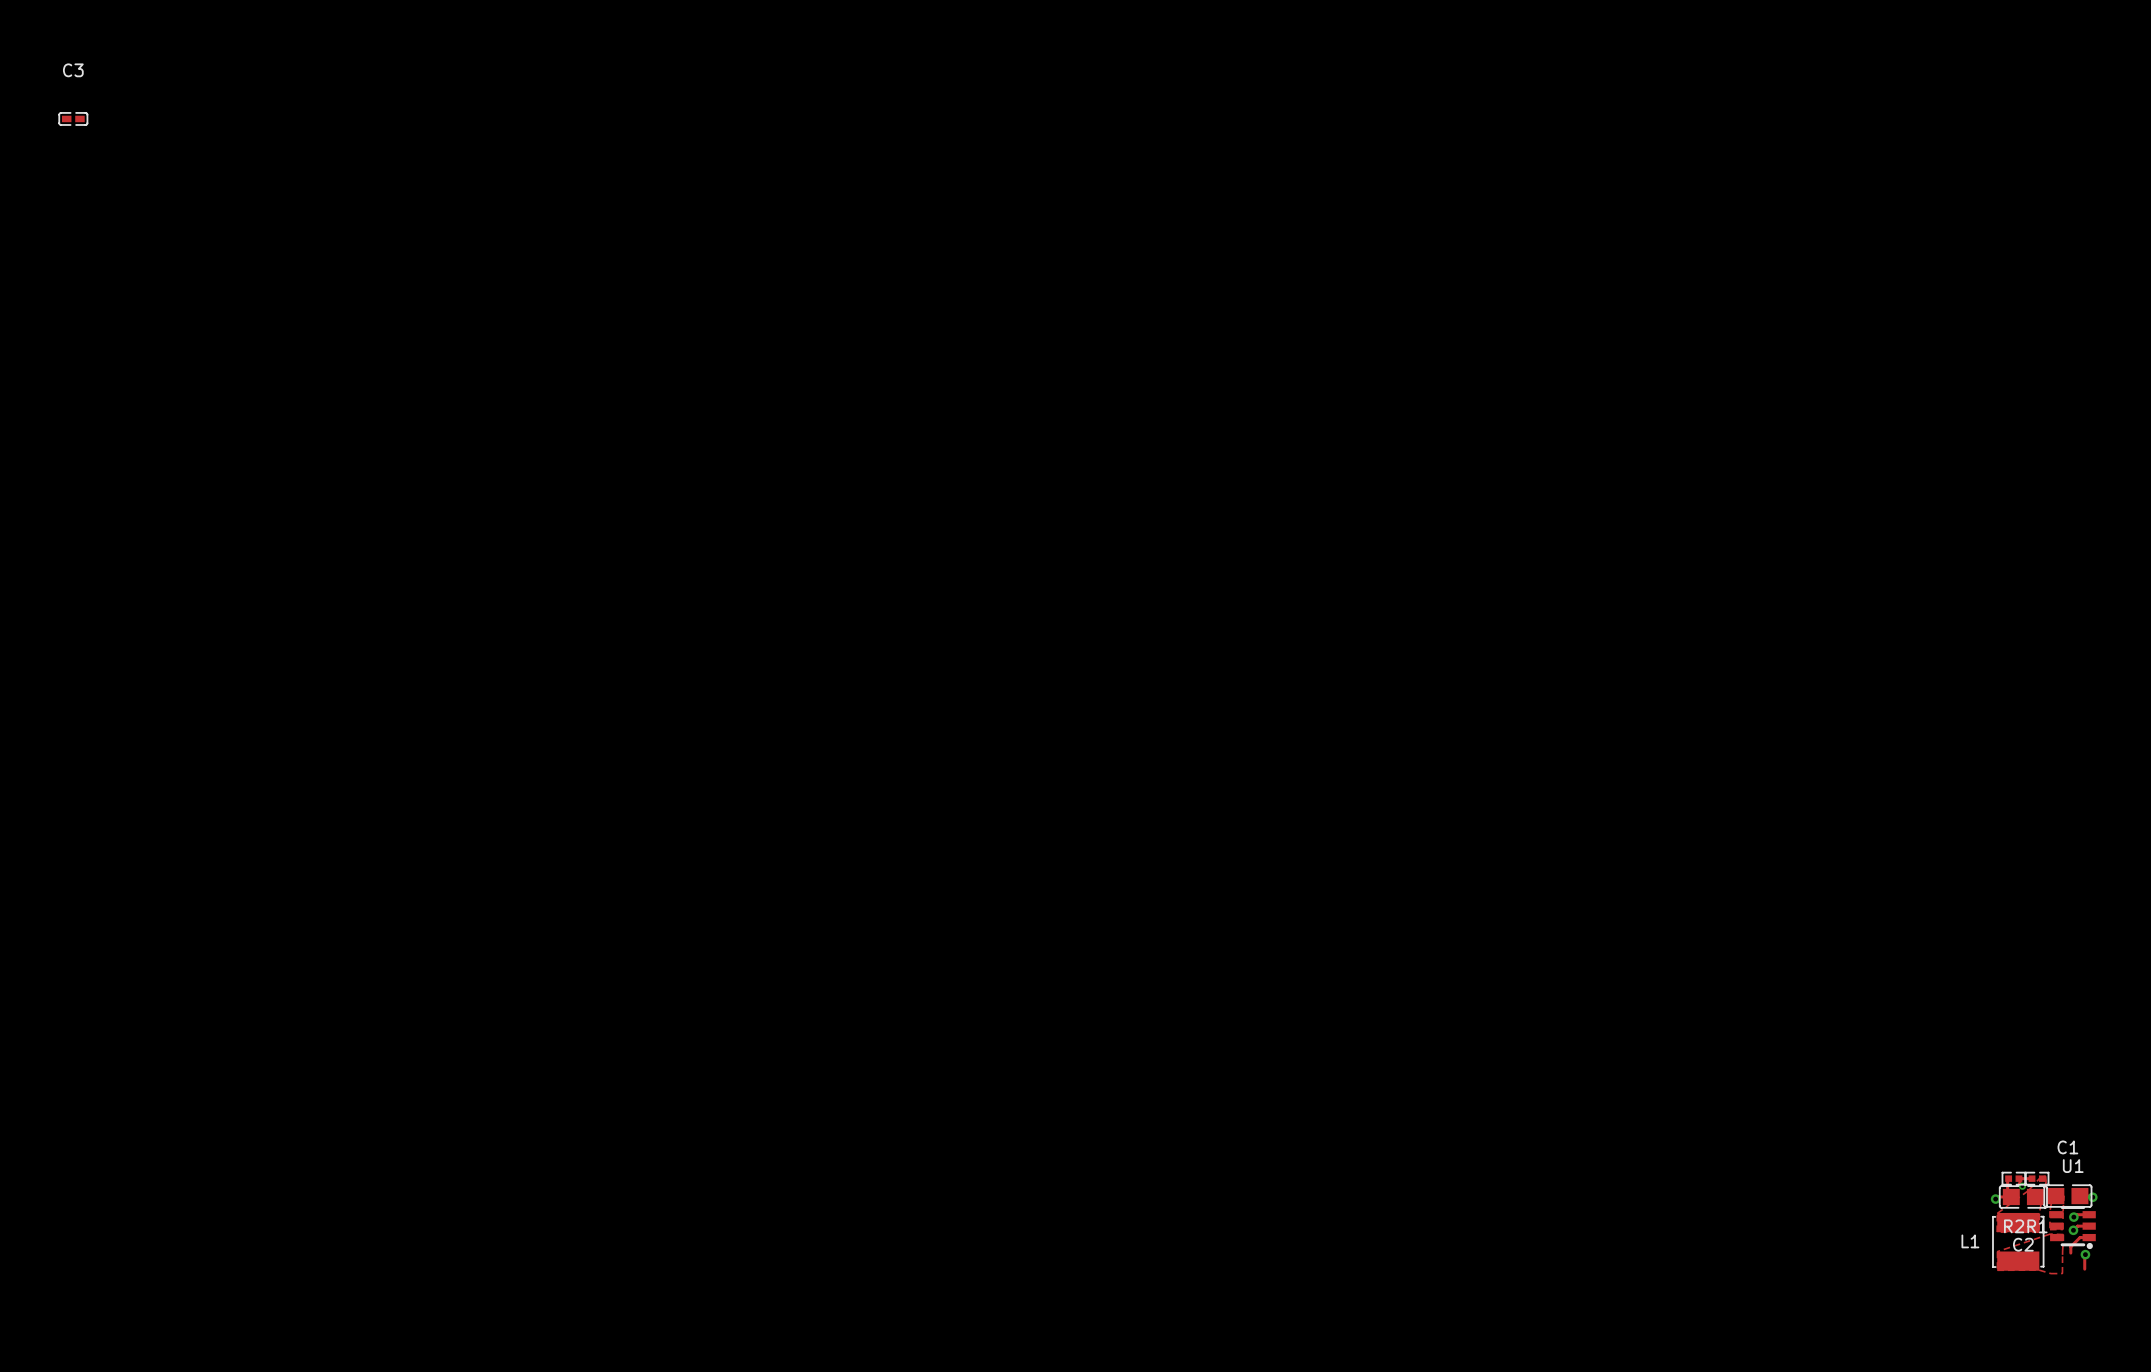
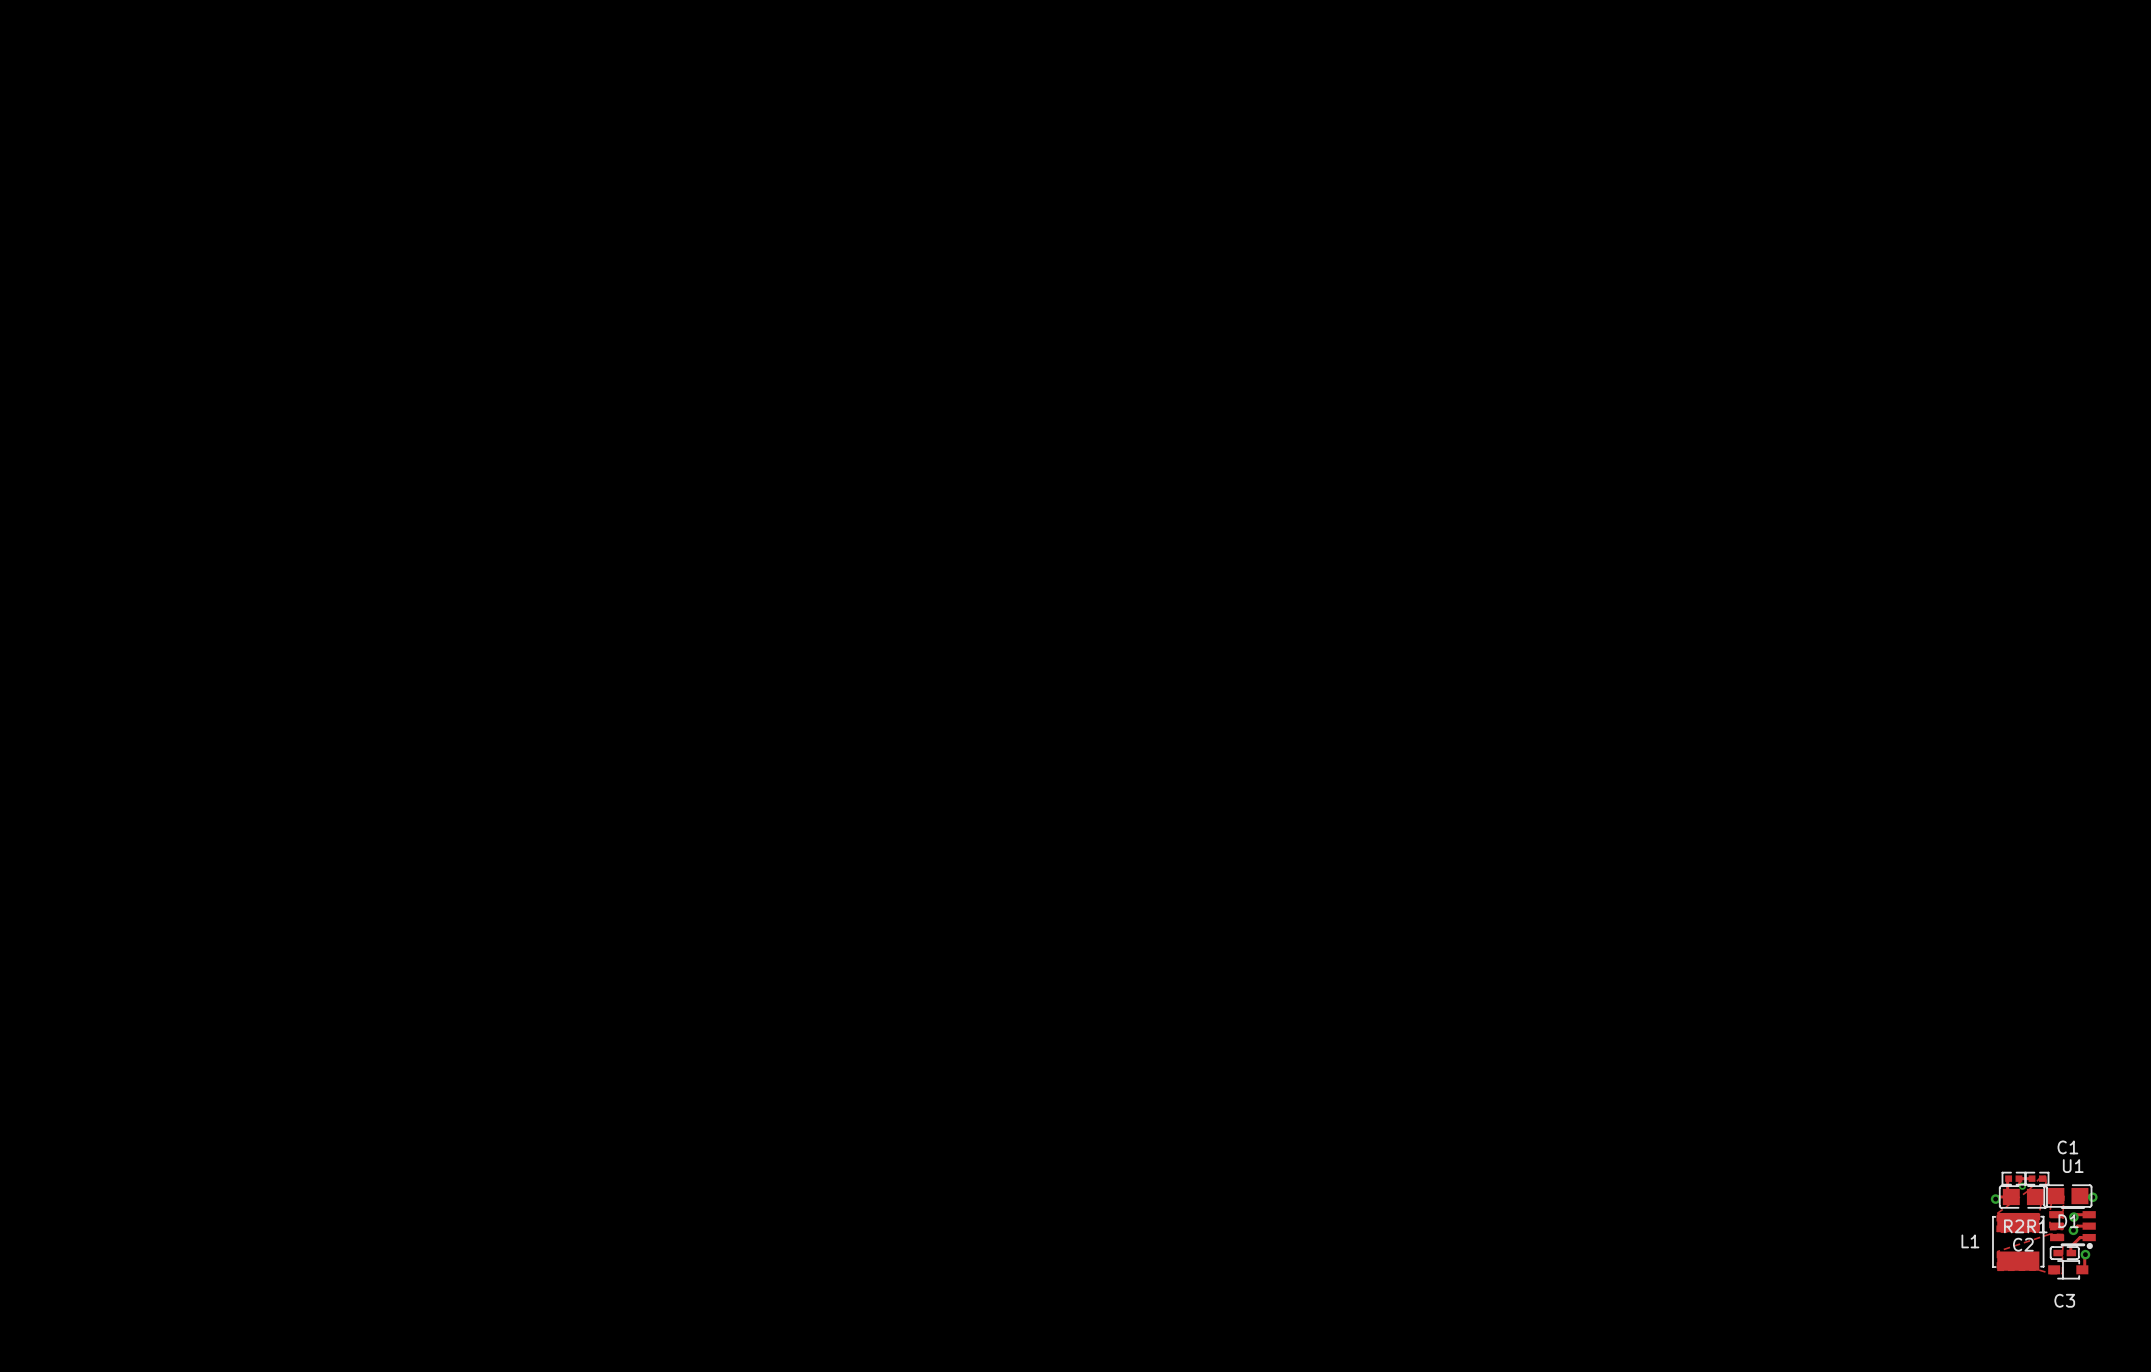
C3 name position: C3 (73, 70) -> C3 (2064, 1300)
C3 position: (73, 118) -> (2064, 1253)
D1: none -> (2068, 1269)

